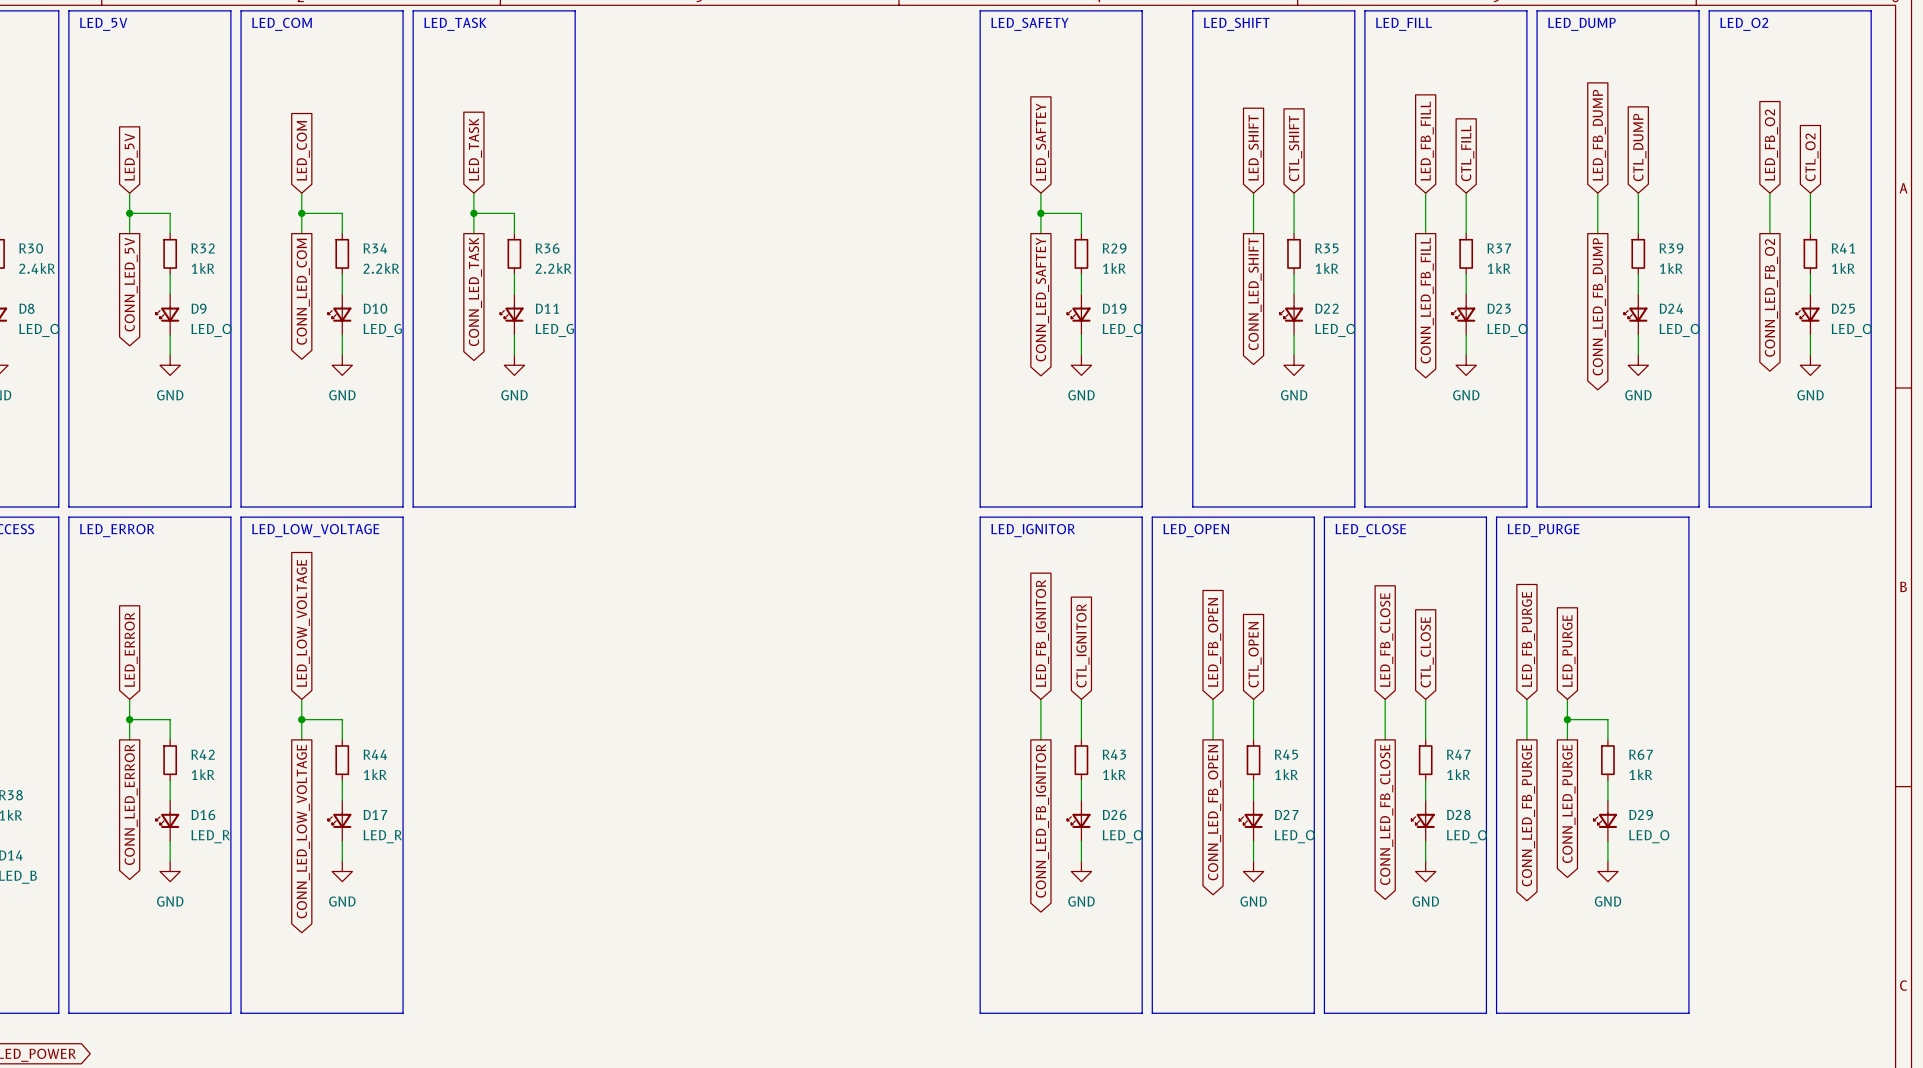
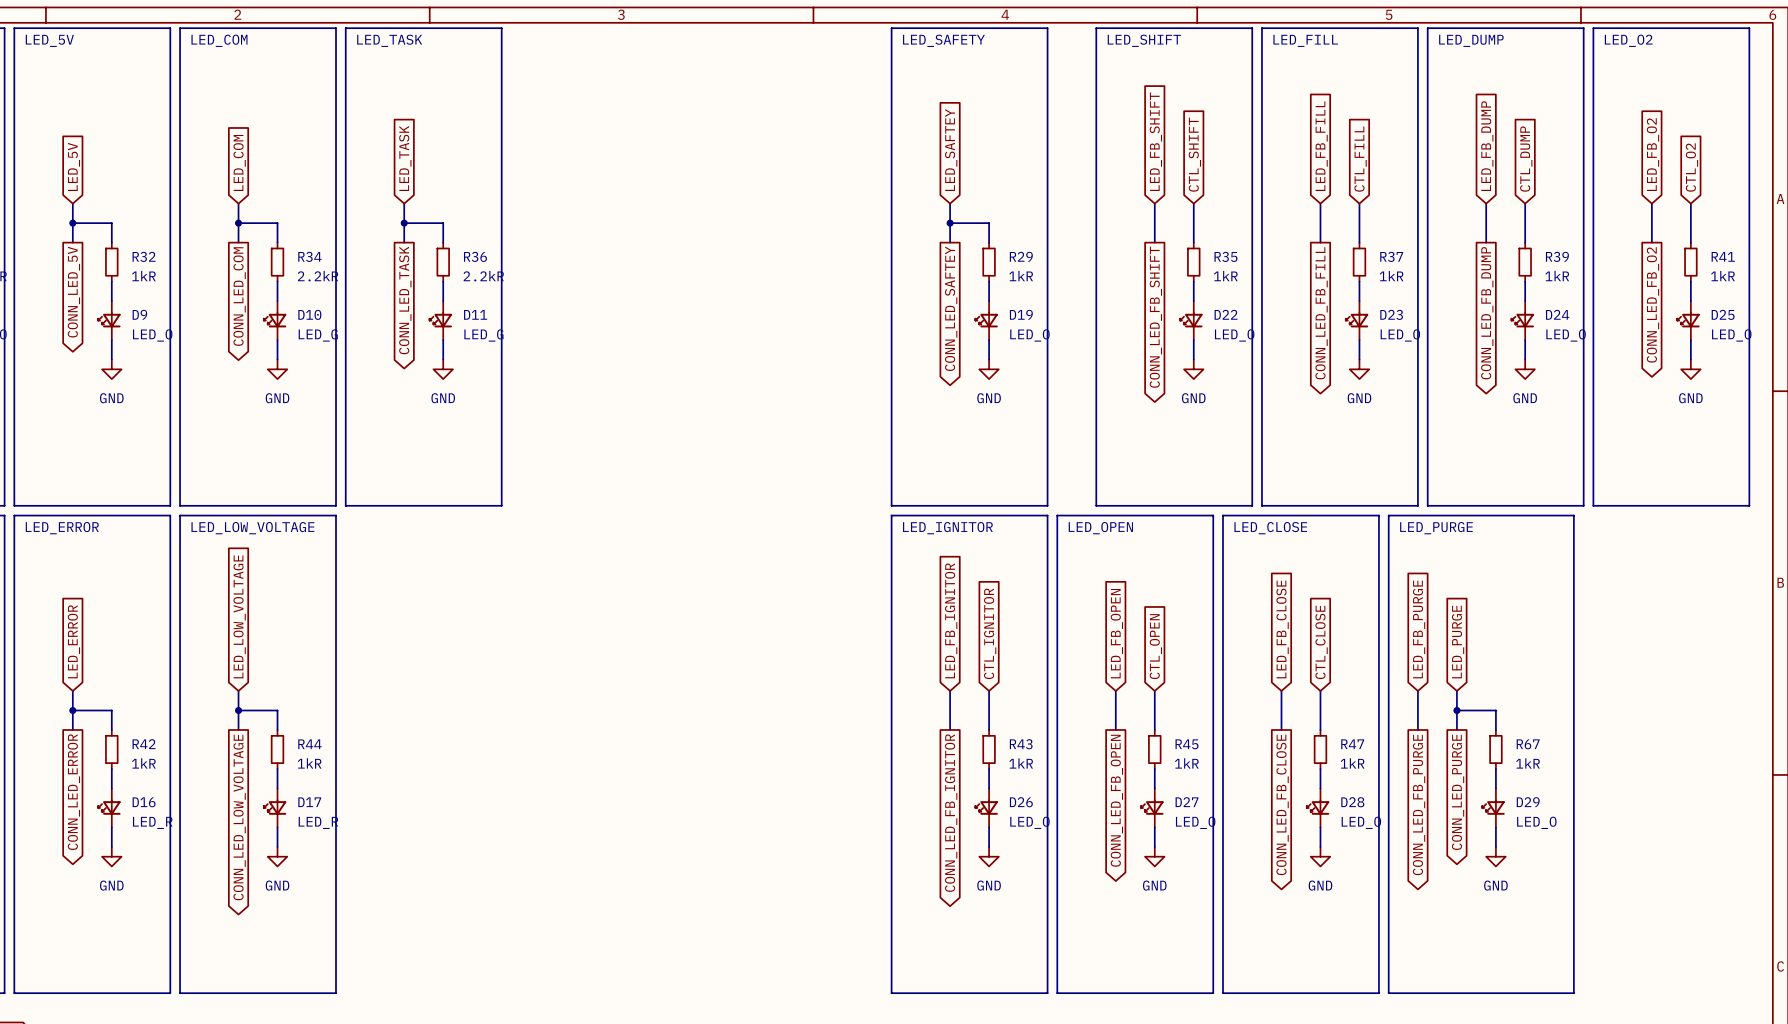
global label: LED_SHIFT (1255, 147) -> LED_FB_SHIFT (1155, 141)
global label: CONN_LED_SHIFT (1255, 294) -> CONN_LED_FB_SHIFT (1155, 317)

